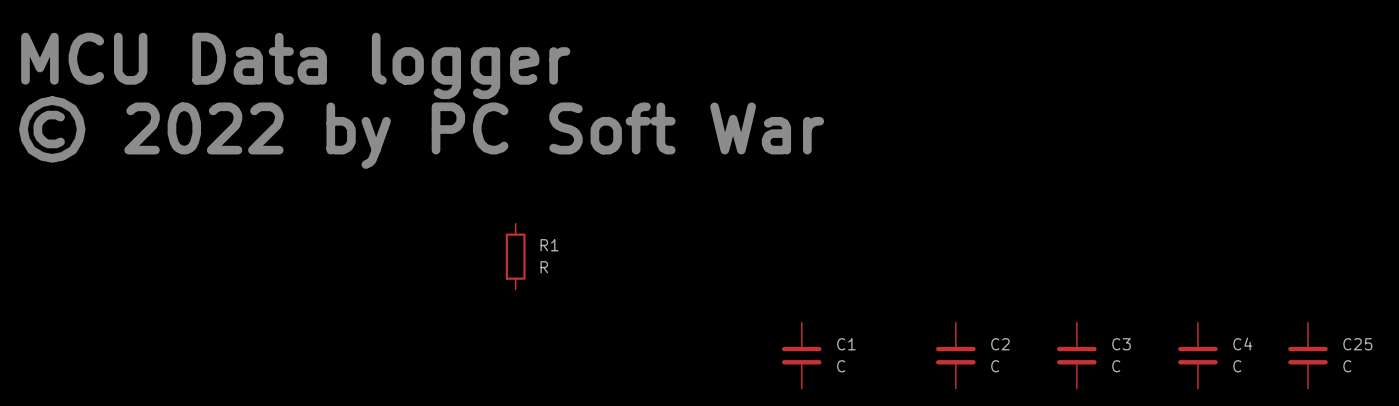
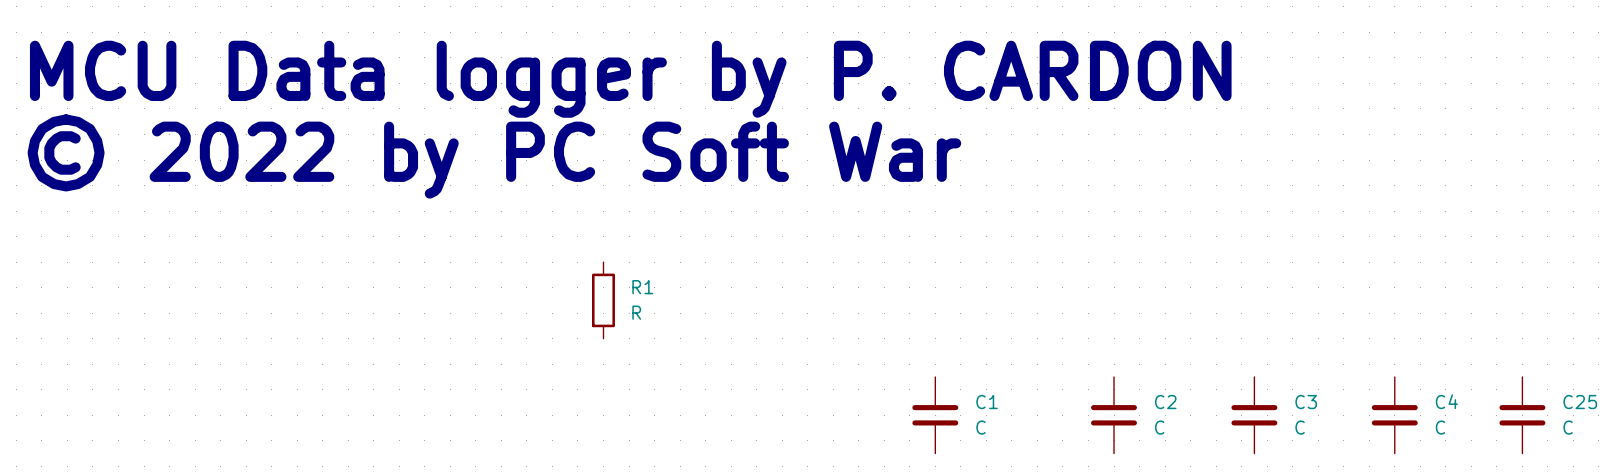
text: MCU Data logger (295, 65) -> MCU Data logger by P. CARDON (630, 79)

